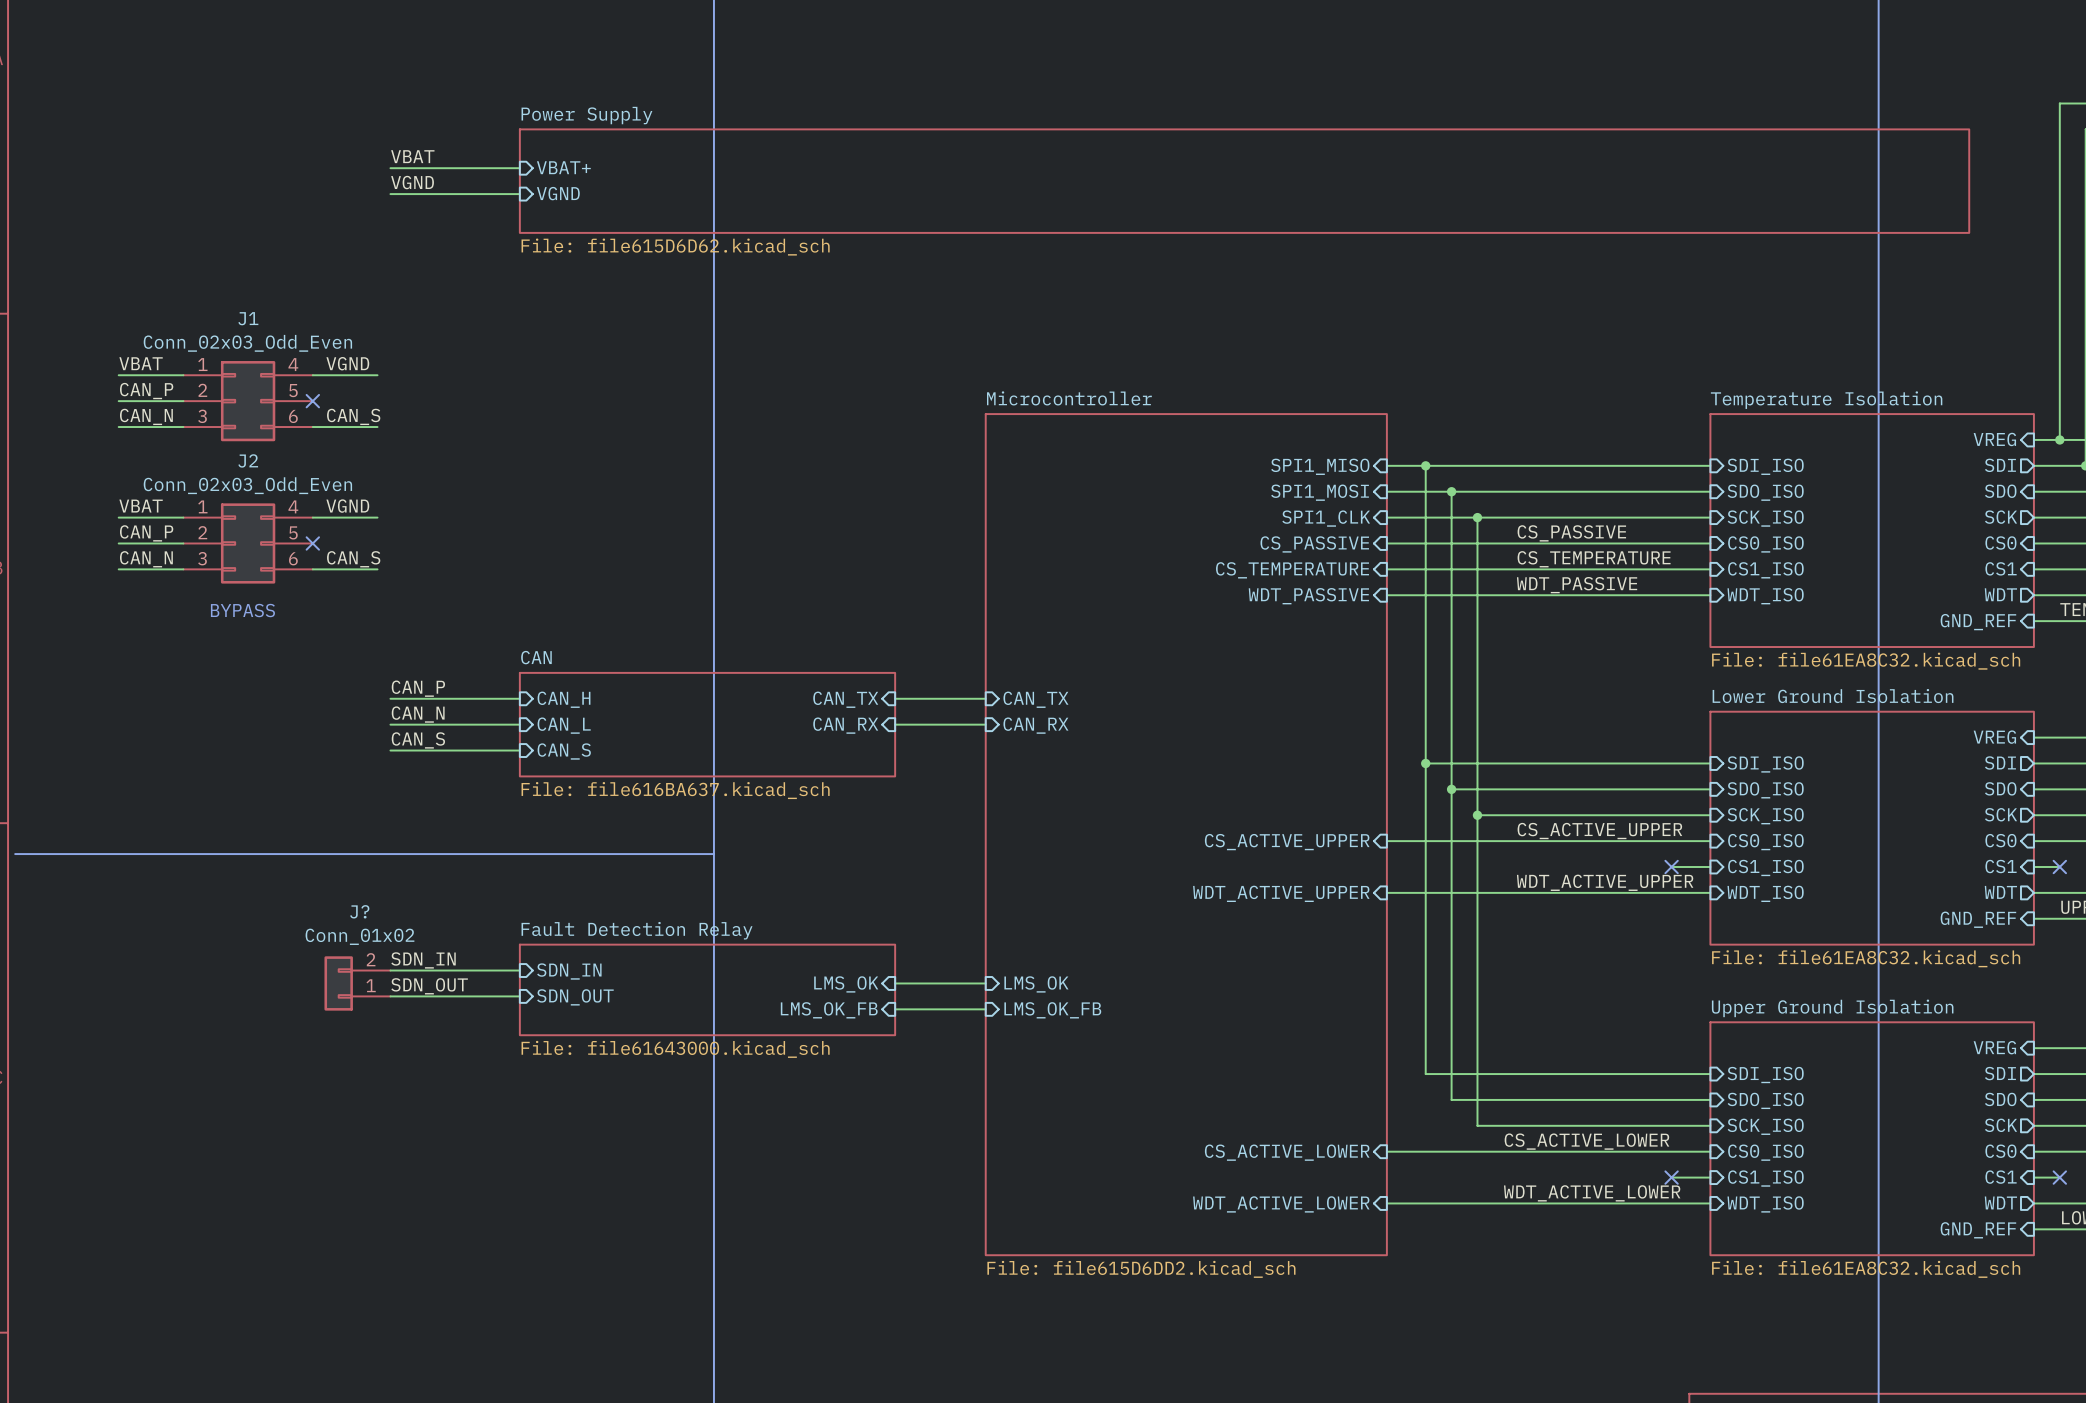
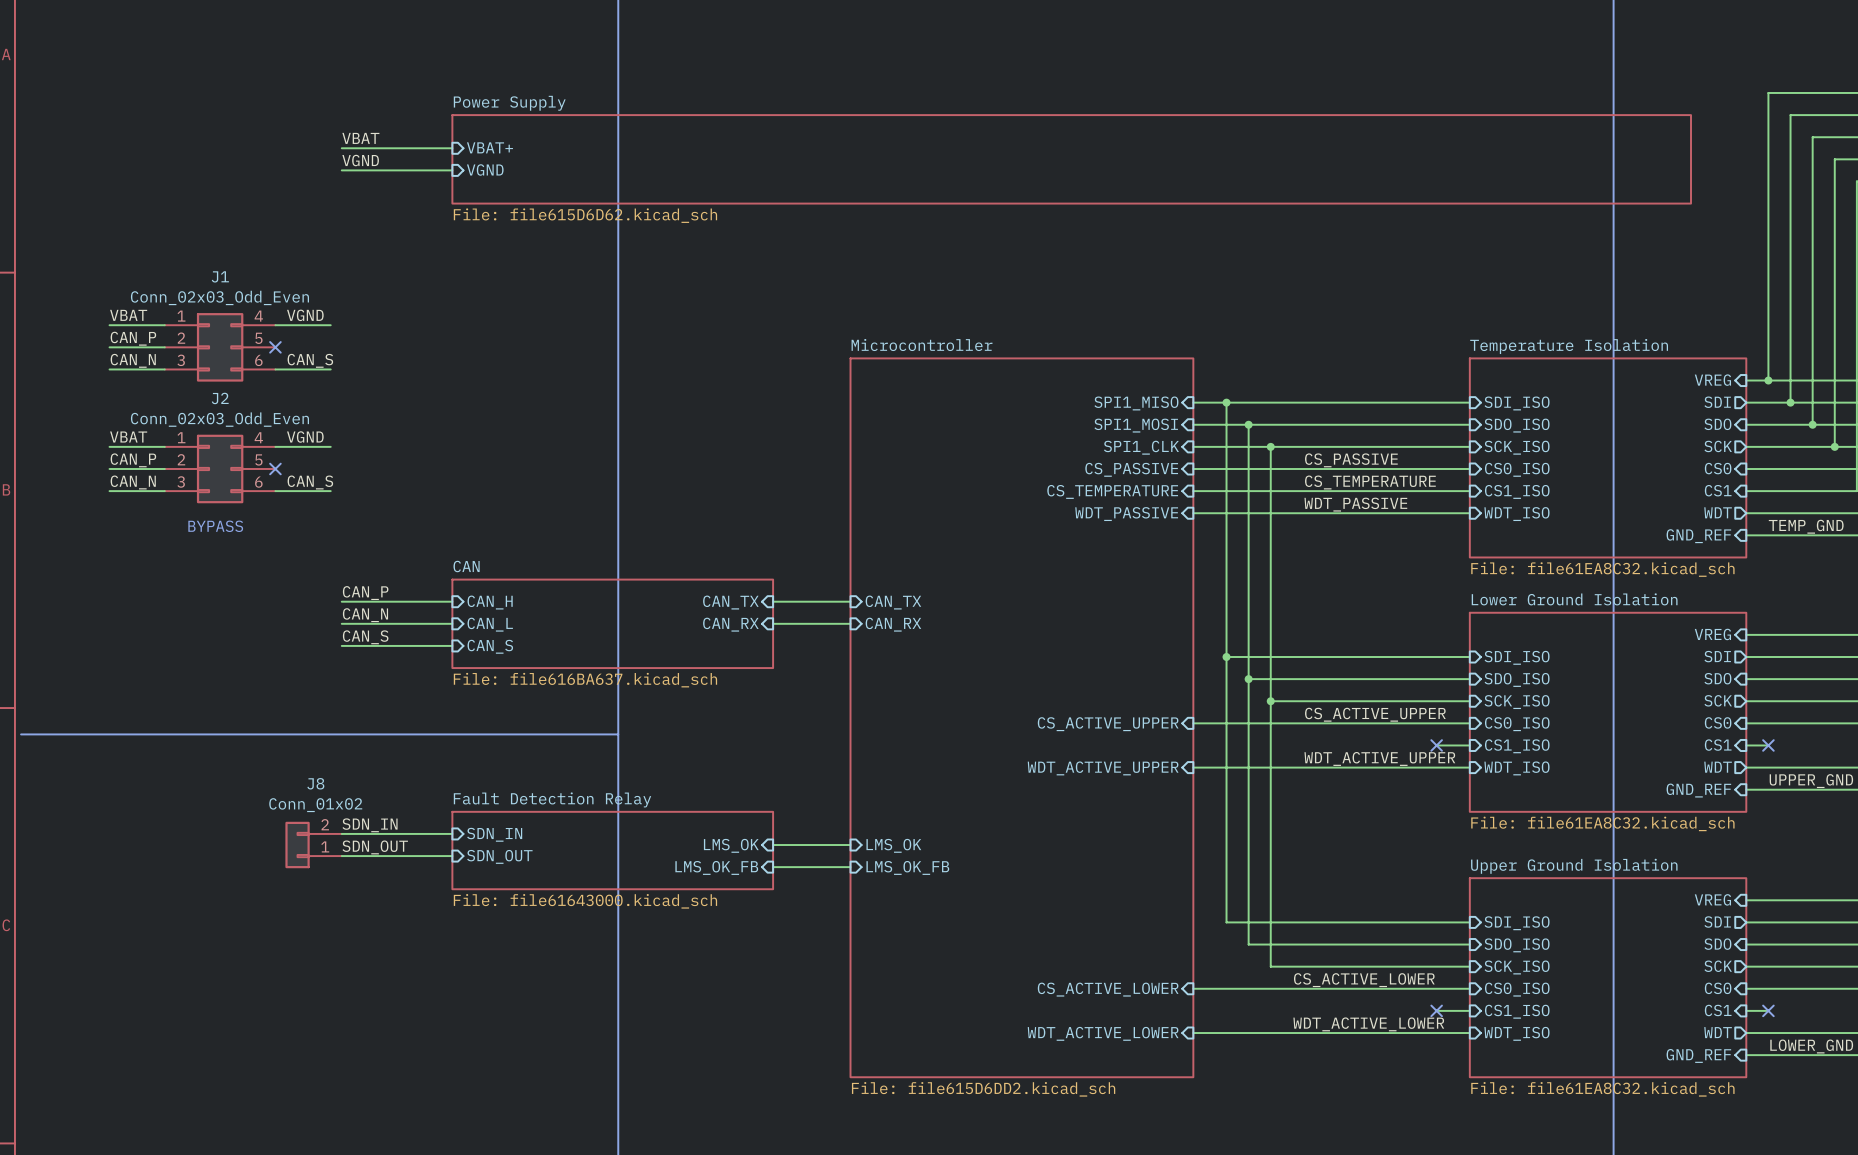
J? name: J? (359, 911) -> J8 (315, 783)

